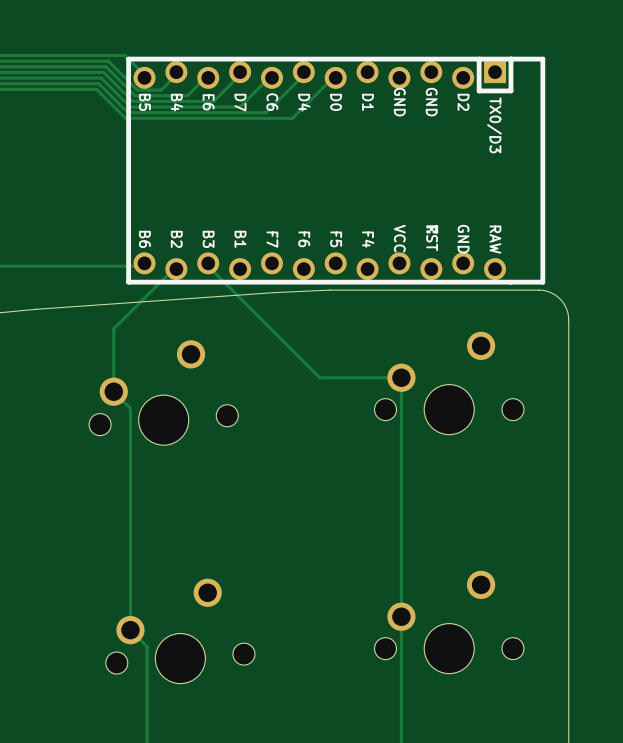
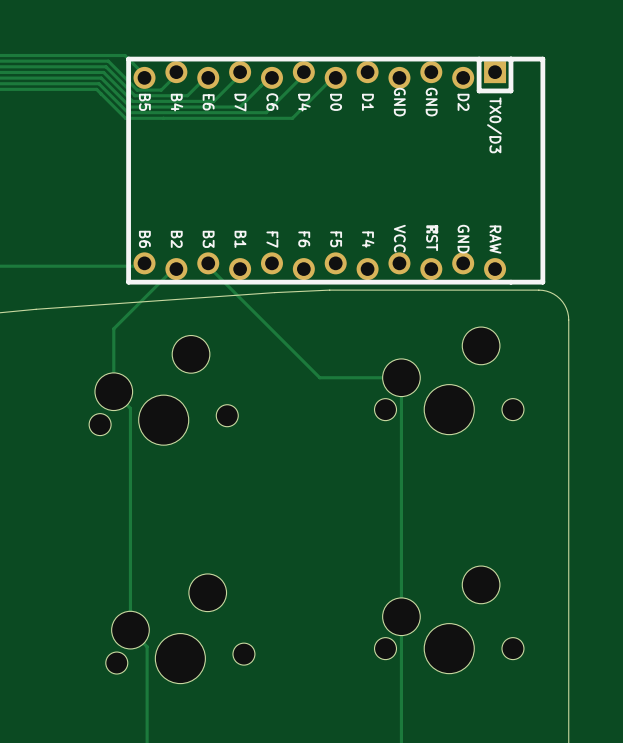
part footprint: [374, 331, 524, 435] -> [374, 327, 524, 435]
part footprint: [89, 340, 239, 446] -> [89, 335, 239, 446]
part footprint: [374, 570, 524, 674] -> [374, 566, 524, 674]
part footprint: [105, 578, 255, 684] -> [105, 573, 255, 684]

